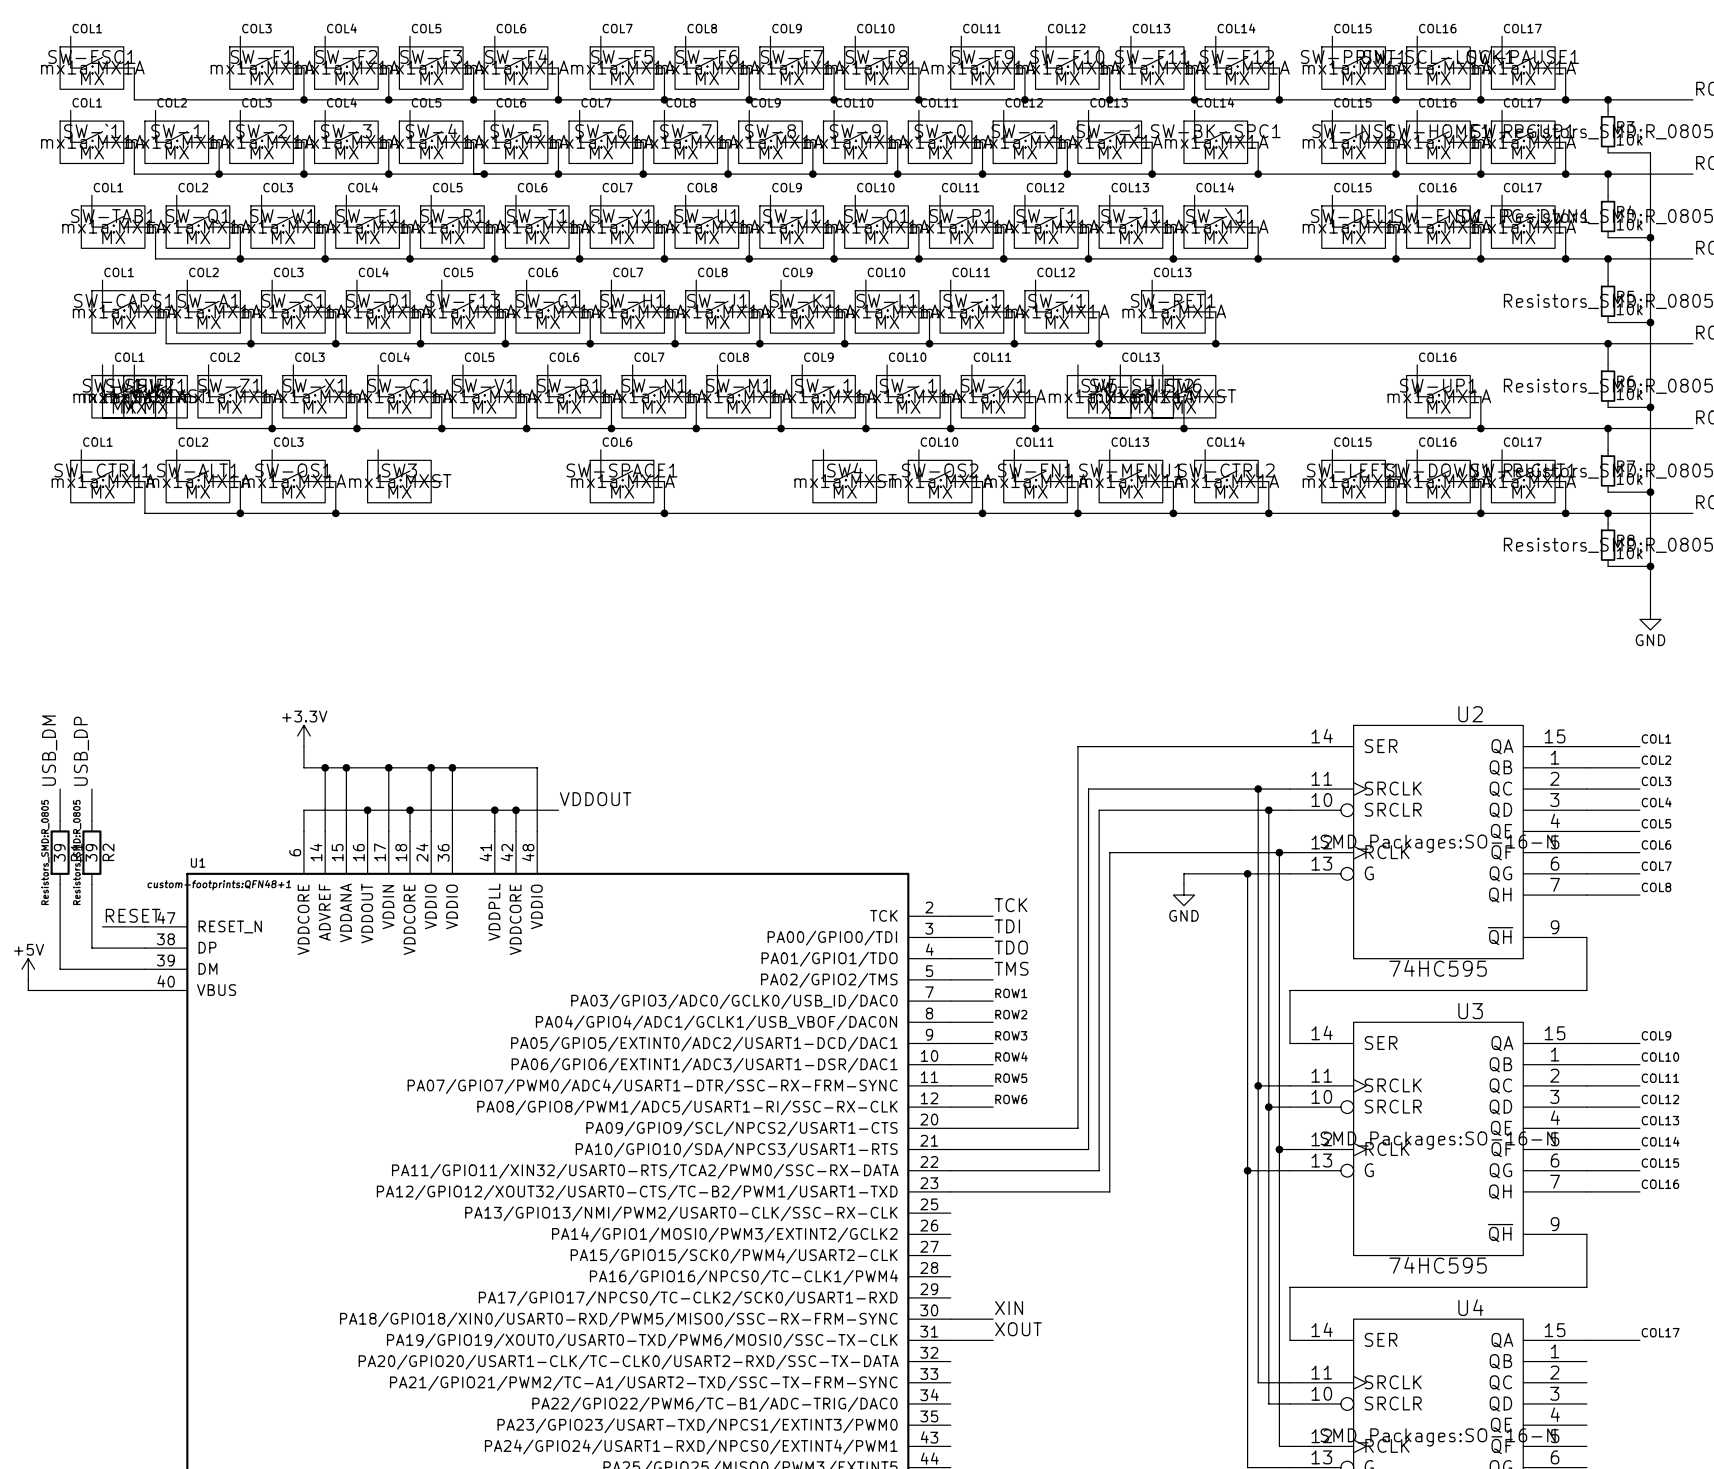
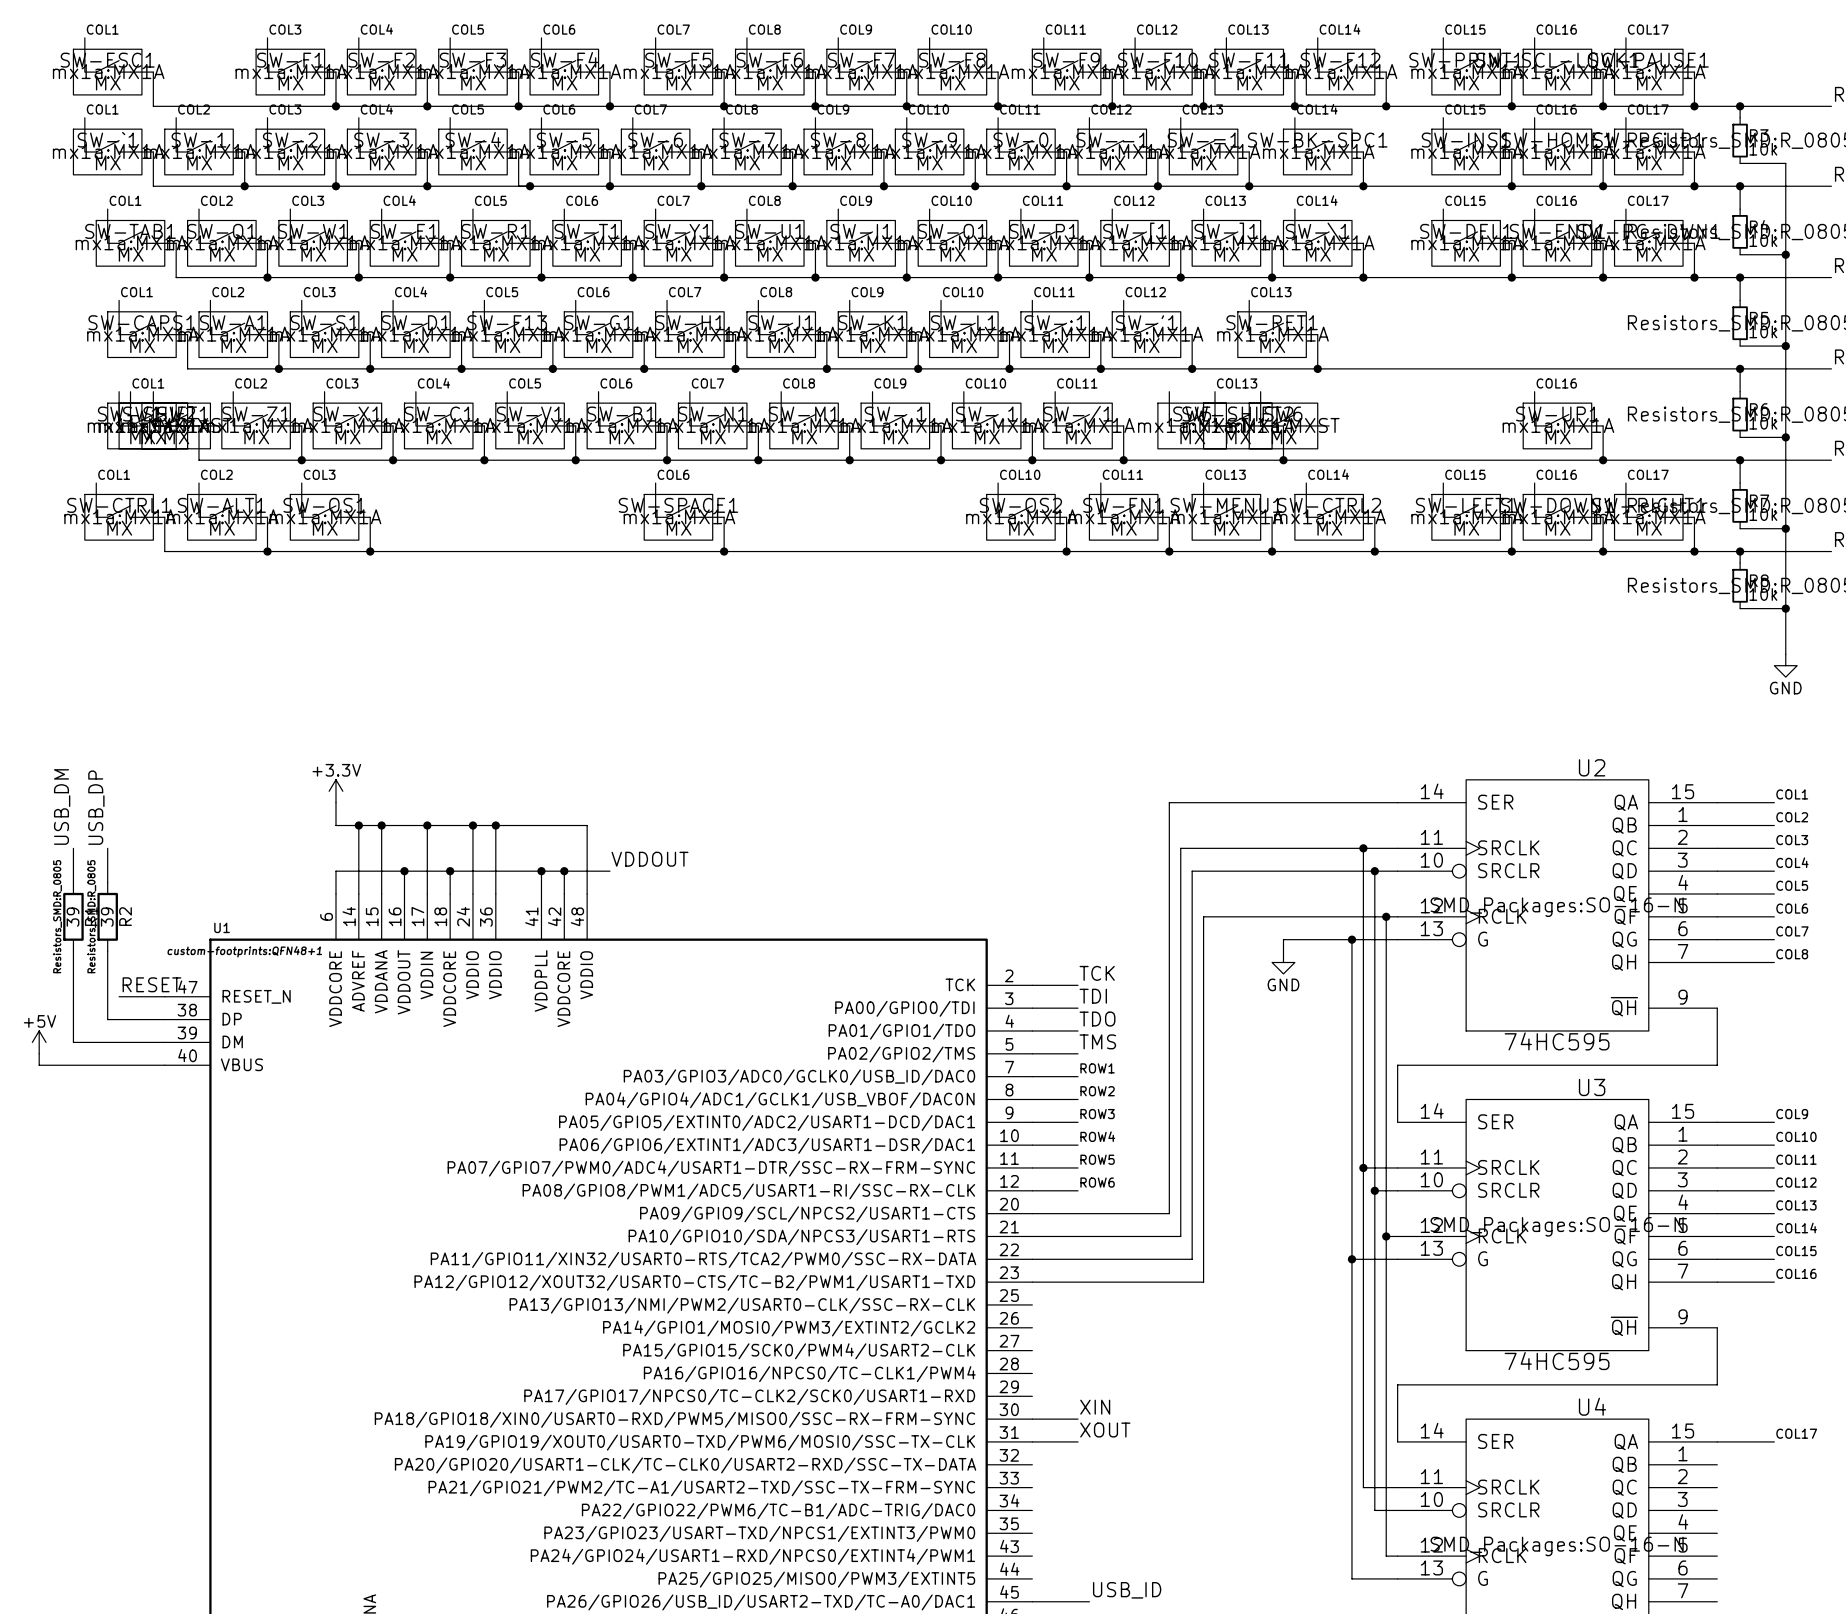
SW3: MX (404, 476) -> none
SW4: MX (850, 476) -> none

